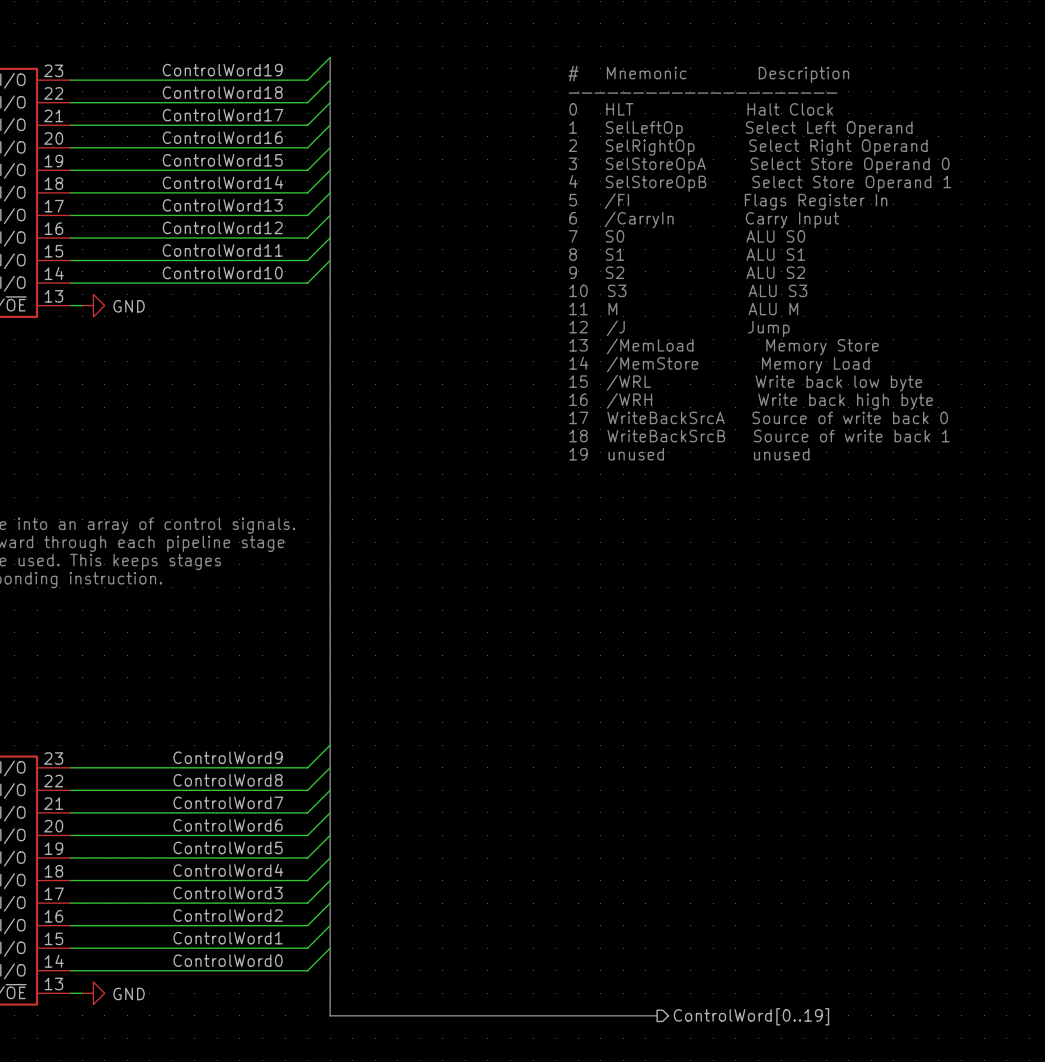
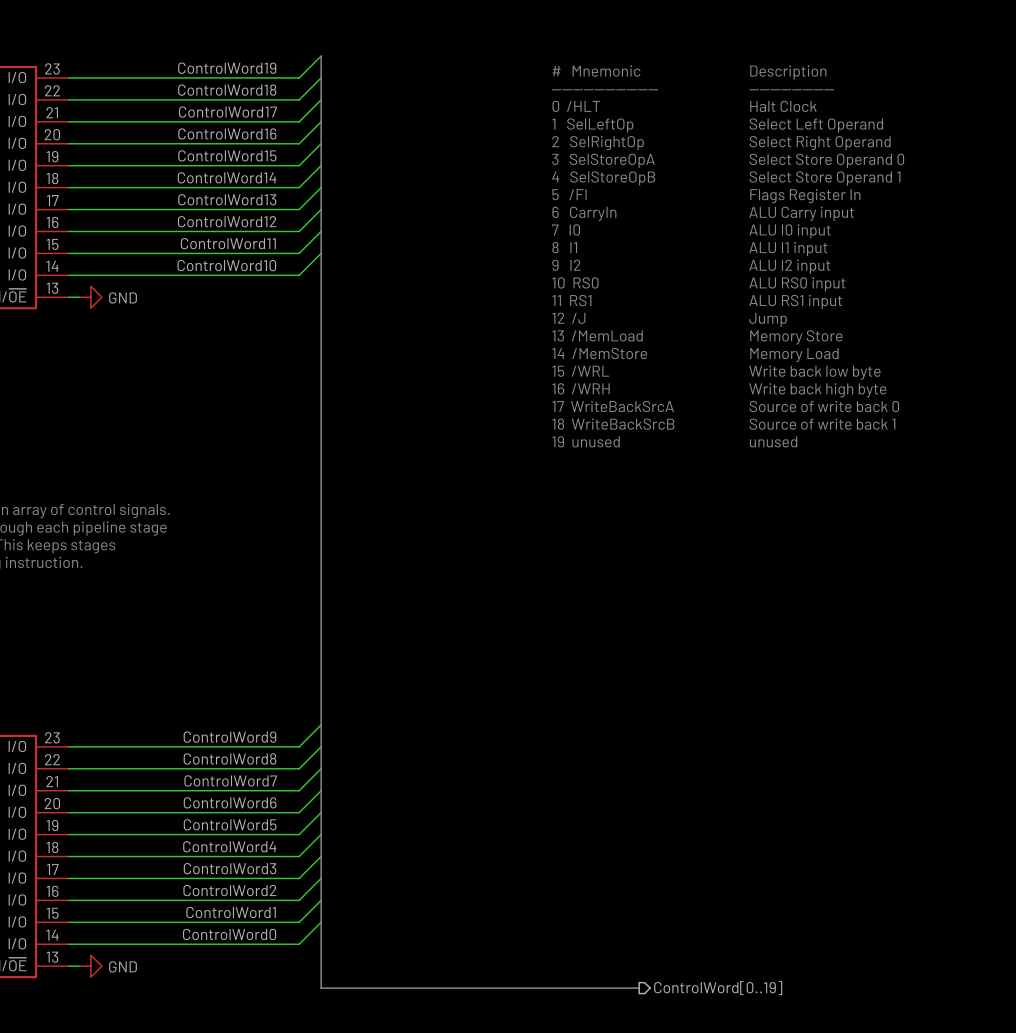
text: # Mnemonic Description (708, 74) -> # Mnemonic (596, 71)
text: none -> Description (788, 72)
text: ————————————————————— (703, 93) -> —————————— (605, 89)
text: none -> ———————— (791, 89)
text: 0 HLT Halt Clock (701, 109) -> 0 /HLT (576, 106)
text: none -> Halt Clock (783, 106)
text: 1 SelLeftOp Select Left Operand (740, 129) -> 1 SelLeftOp (592, 125)
text: none -> Select Left Operand (816, 125)
text: 2 SelRightOp Select Right Operand (748, 147) -> 2 SelRightOp (598, 143)
text: none -> Select Right Operand (820, 143)
text: 3 SelStoreOpA Select Store Operand 0 (759, 165) -> 3 SelStoreOpA (603, 160)
text: none -> Select Store Operand 0 (826, 160)
text: 4 SelStoreOpB Select Store Operand 1 (760, 183) -> 4 SelStoreOpB (603, 178)
text: none -> Select Store Operand 1 (825, 178)
text: 5 /FI Flags Register In (728, 201) -> 5 /FI (569, 194)
text: none -> Flags Register In (805, 196)
text: 6 /CarryIn Carry Input (704, 219) -> 6 CarryIn (584, 213)
text: none -> ALU Carry input (801, 213)
text: 7 S0 ALU S0 (686, 236) -> 7 I0 (566, 229)
text: none -> ALU I0 input (790, 231)
text: 8 S1 ALU S1 (687, 254) -> 8 I1 (564, 247)
text: none -> ALU I1 input (788, 249)
text: 9 S2 ALU S2 (687, 272) -> 9 I2 (566, 265)
text: none -> ALU I2 input (789, 266)
text: 10 S3 ALU S3 (688, 290) -> 10 RS0 (575, 282)
text: none -> ALU RS0 input (797, 284)
text: 11 M ALU M (683, 309) -> 11 RS1 (571, 300)
text: none -> ALU RS1 input (795, 302)
text: 12 /J Jump (679, 328) -> 12 /J (568, 318)
text: none -> Jump (768, 319)
text: 13 /MemLoad Memory Store (723, 346) -> 13 /MemLoad (597, 335)
text: none -> Memory Store (796, 337)
text: 14 /MemStore Memory Load (719, 365) -> 14 /MemStore (599, 353)
text: none -> Memory Load (794, 355)
text: 15 /WRL Write back low byte (745, 383) -> 15 /WRL (580, 371)
text: none -> Write back low byte (814, 372)
text: 16 /WRH Write back high byte (751, 401) -> 16 /WRH (580, 388)
text: none -> Write back high byte (817, 390)
text: 17 WriteBackSrcA Source of write back 0 (758, 417) -> 17 WriteBackSrcA (613, 406)
text: none -> Source of write back 0 (824, 406)
text: 18 WriteBackSrcB Source of write back 1 (759, 436) -> 18 WriteBackSrcB (613, 424)
text: none -> Source of write back 1 (822, 424)
text: 19 unused unused (689, 454) -> 19 unused (586, 441)
text: none -> unused (773, 441)

